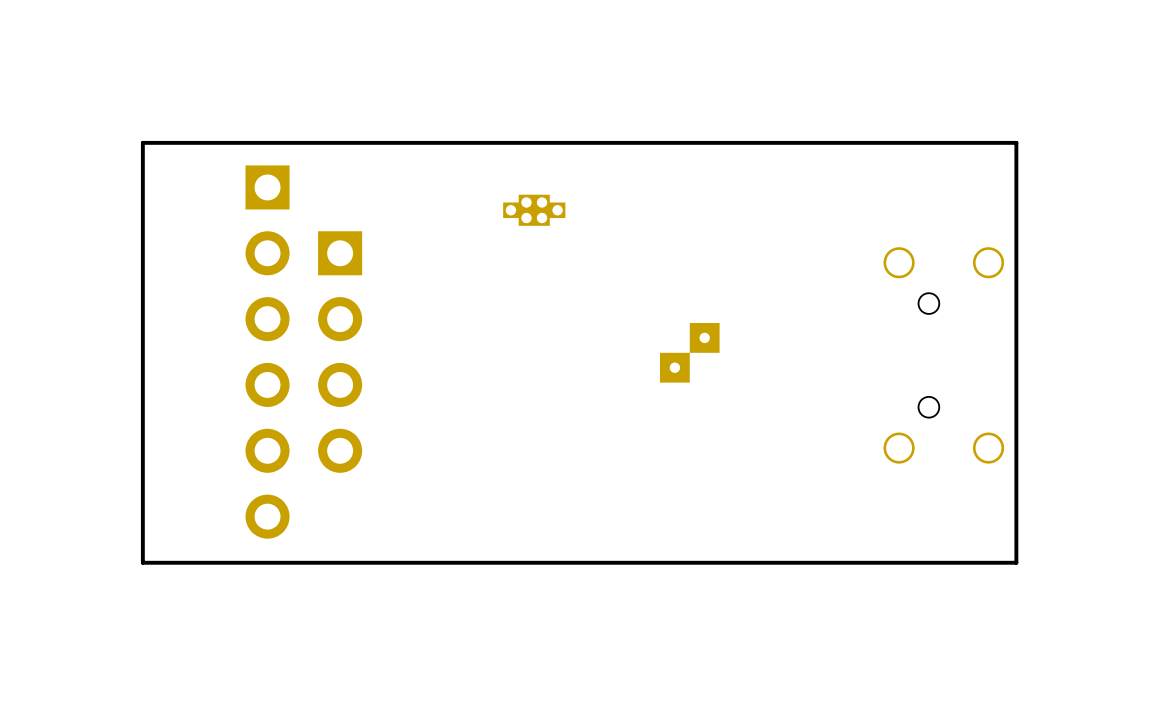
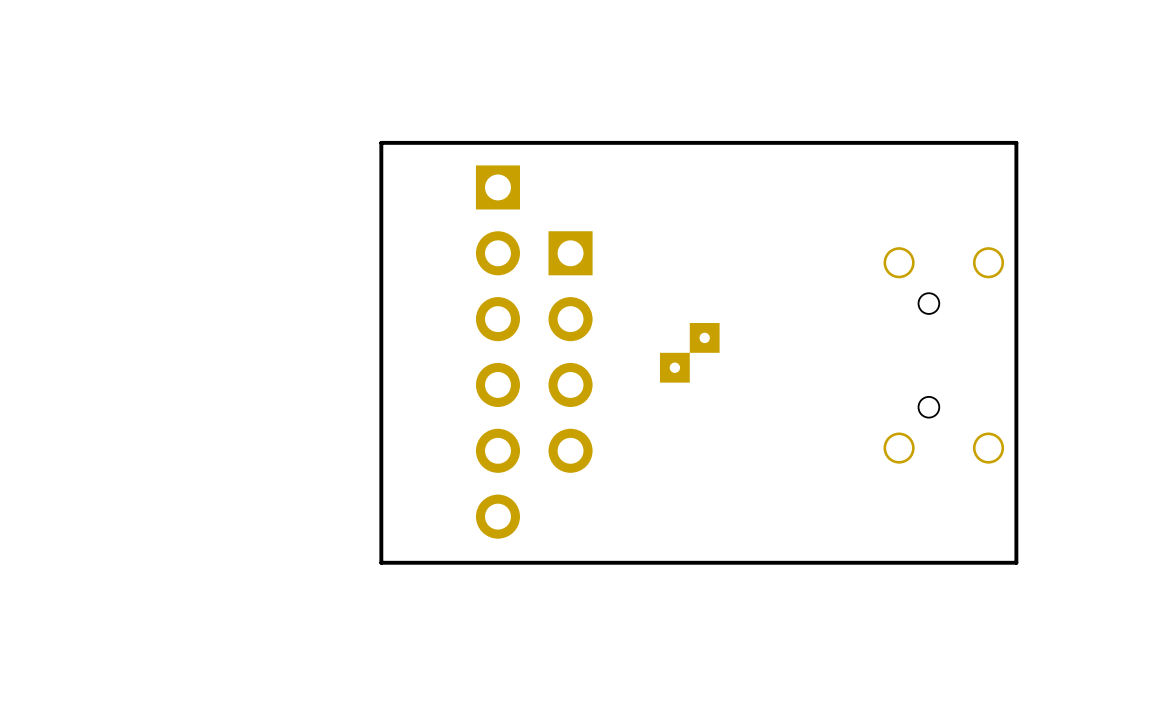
board edge: (381, 142) (142, 142) (142, 562) (381, 562) -> (381, 142) (381, 562)
part: (534, 210) -> none
part position: (267, 352) -> (497, 352)
part position: (340, 352) -> (570, 352)

